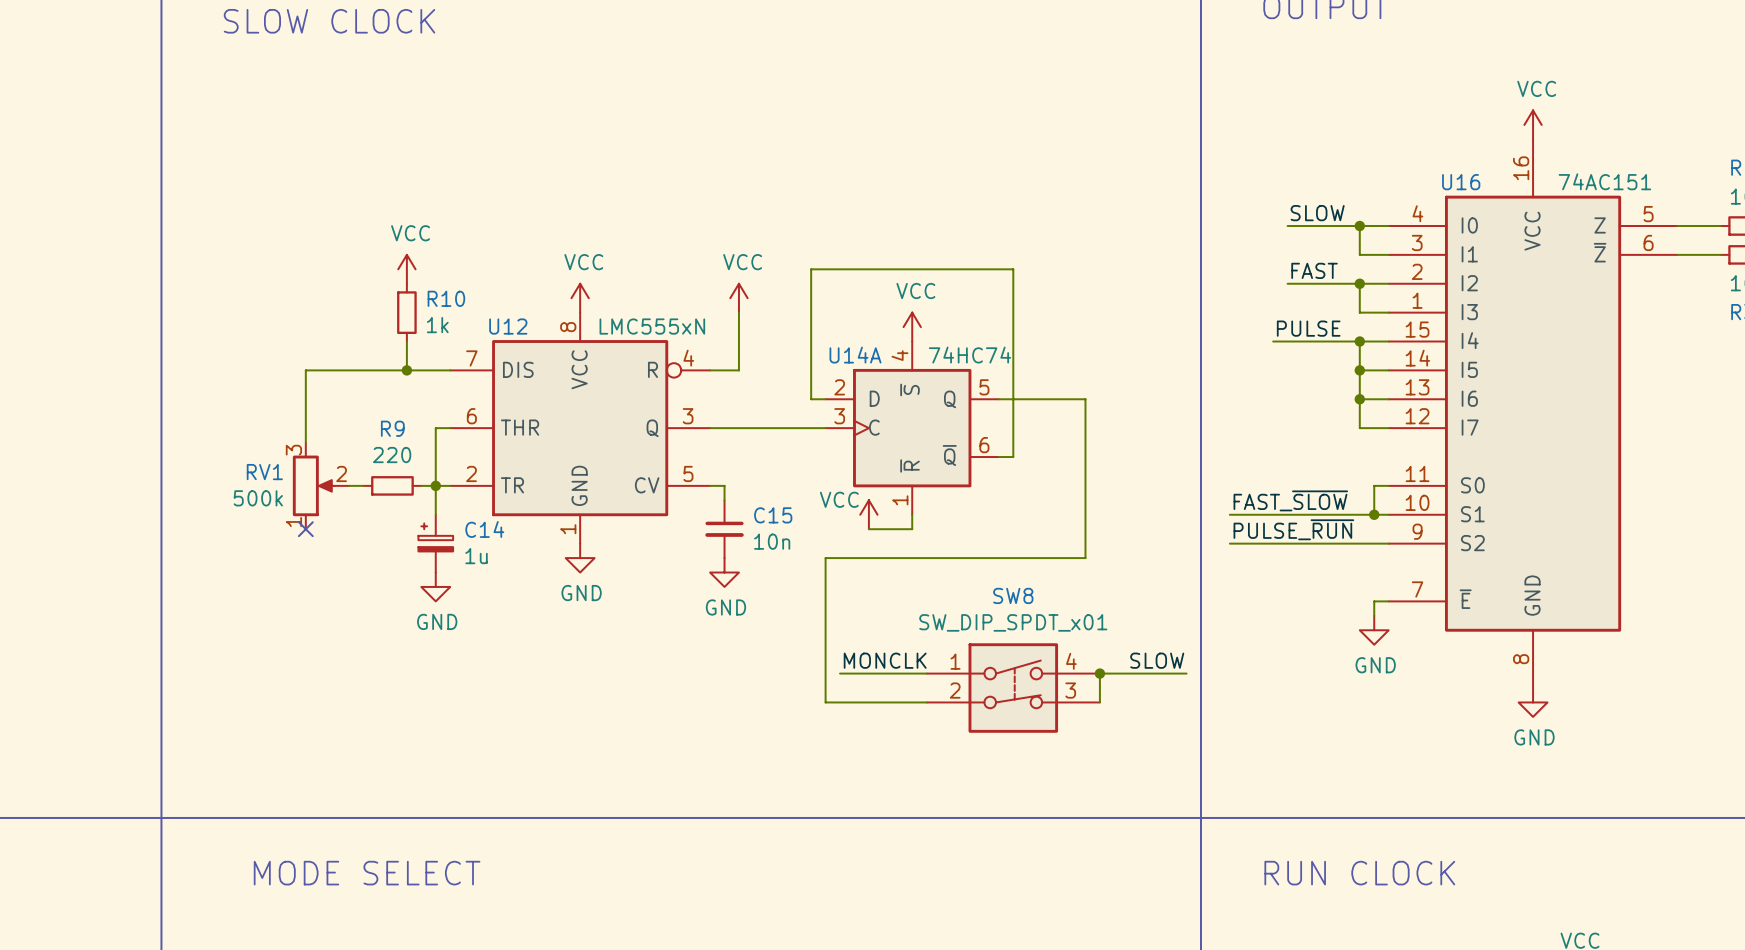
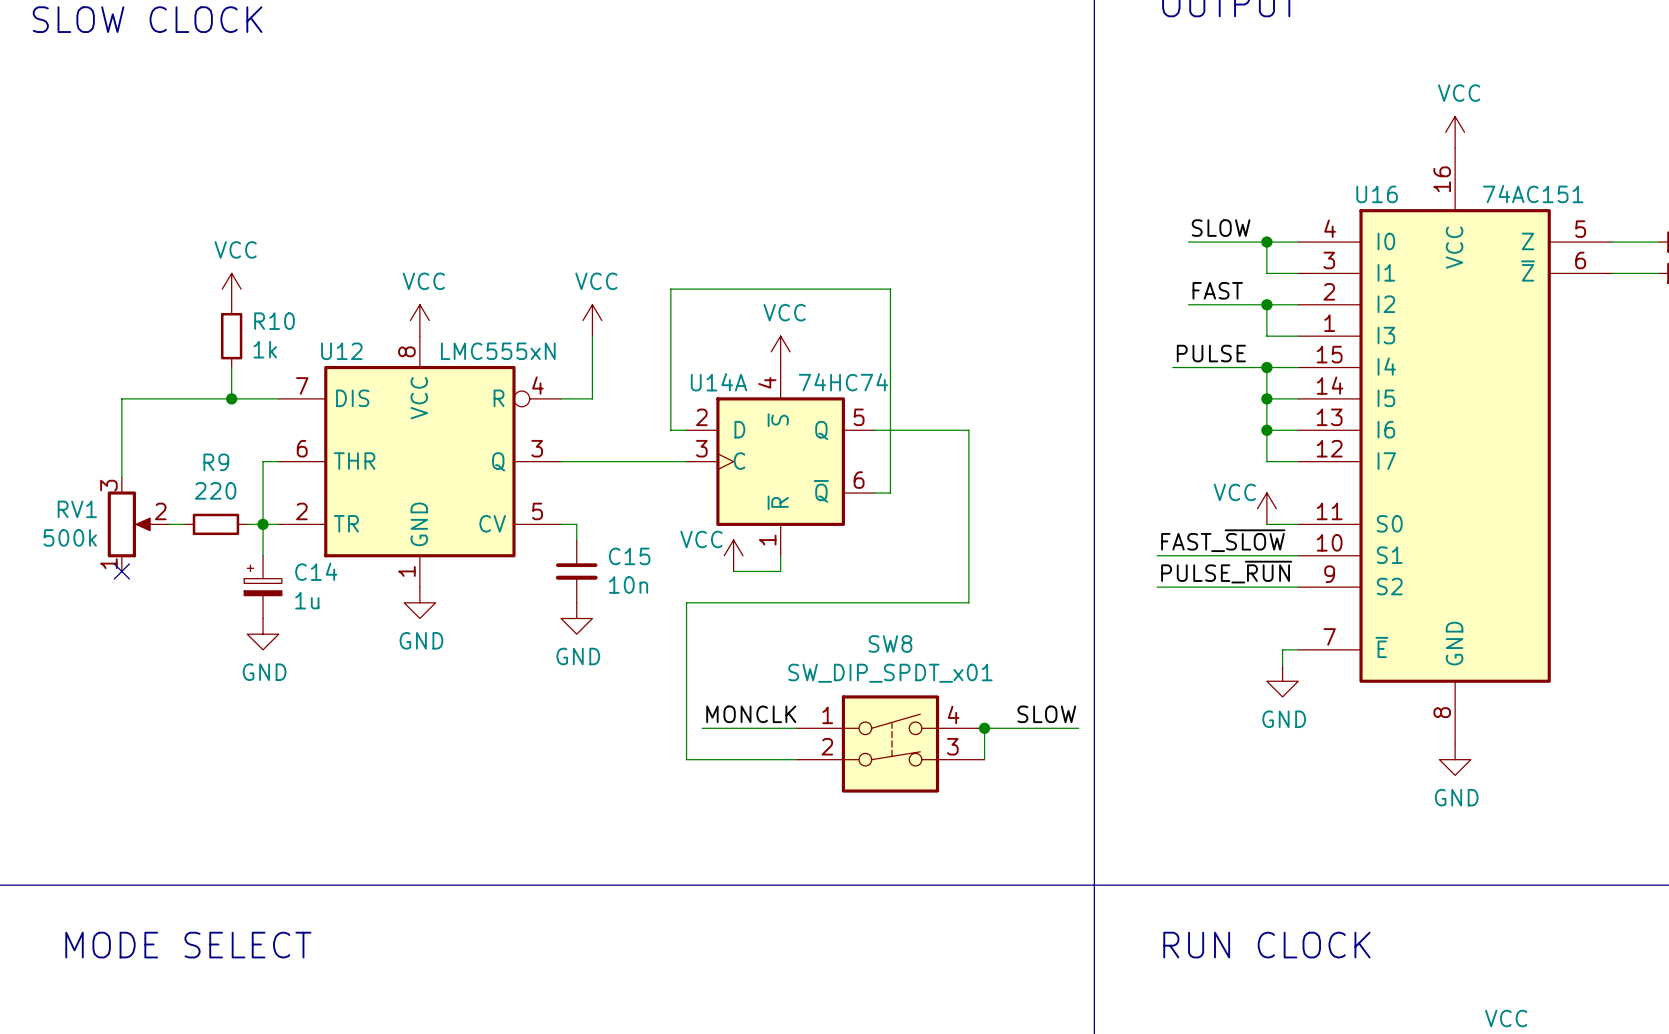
power symbol: none -> VCC (1266, 508)
wire: (1374, 485) (1374, 514) -> (1282, 524) (1266, 524)
label position: FAST_~{SLOW} (1290, 500) -> FAST_~{SLOW} (1223, 540)
wire: (1229, 514) (1258, 514) -> none
junction: (1374, 514) -> none
label position: PULSE_~{RUN} (1293, 529) -> PULSE_~{RUN} (1226, 572)
wire: (1229, 543) (1258, 543) -> none

